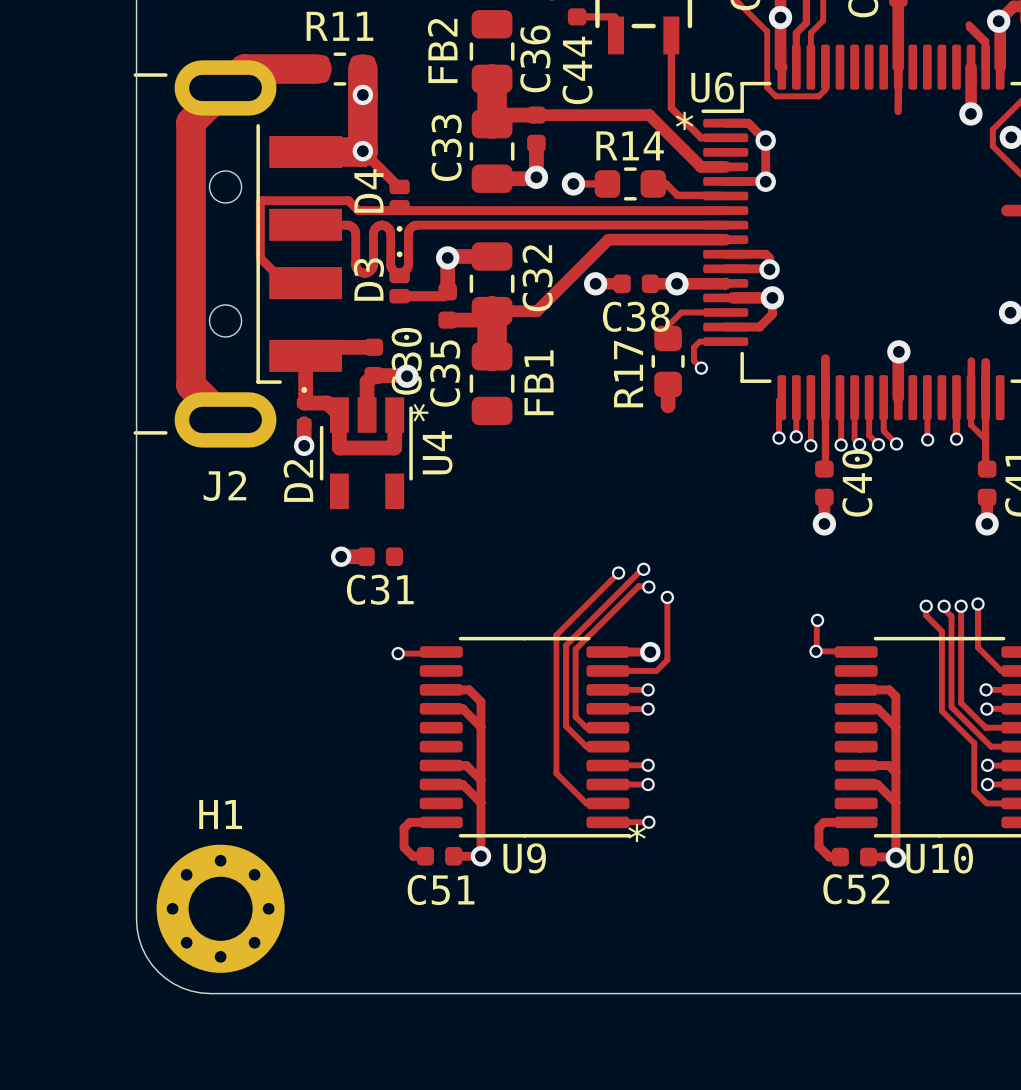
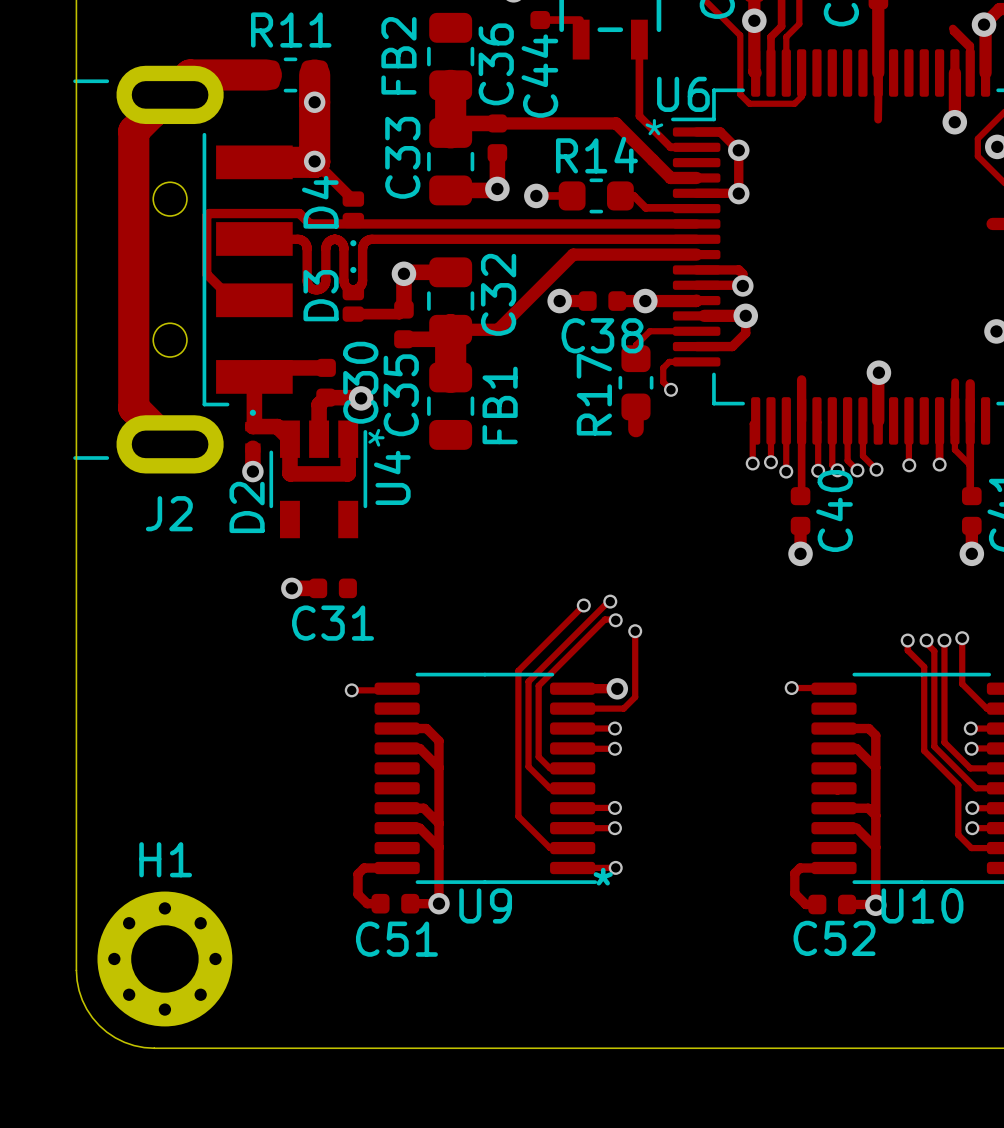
via: (817, 620) -> none
track: (816, 621) (816, 650) -> none

